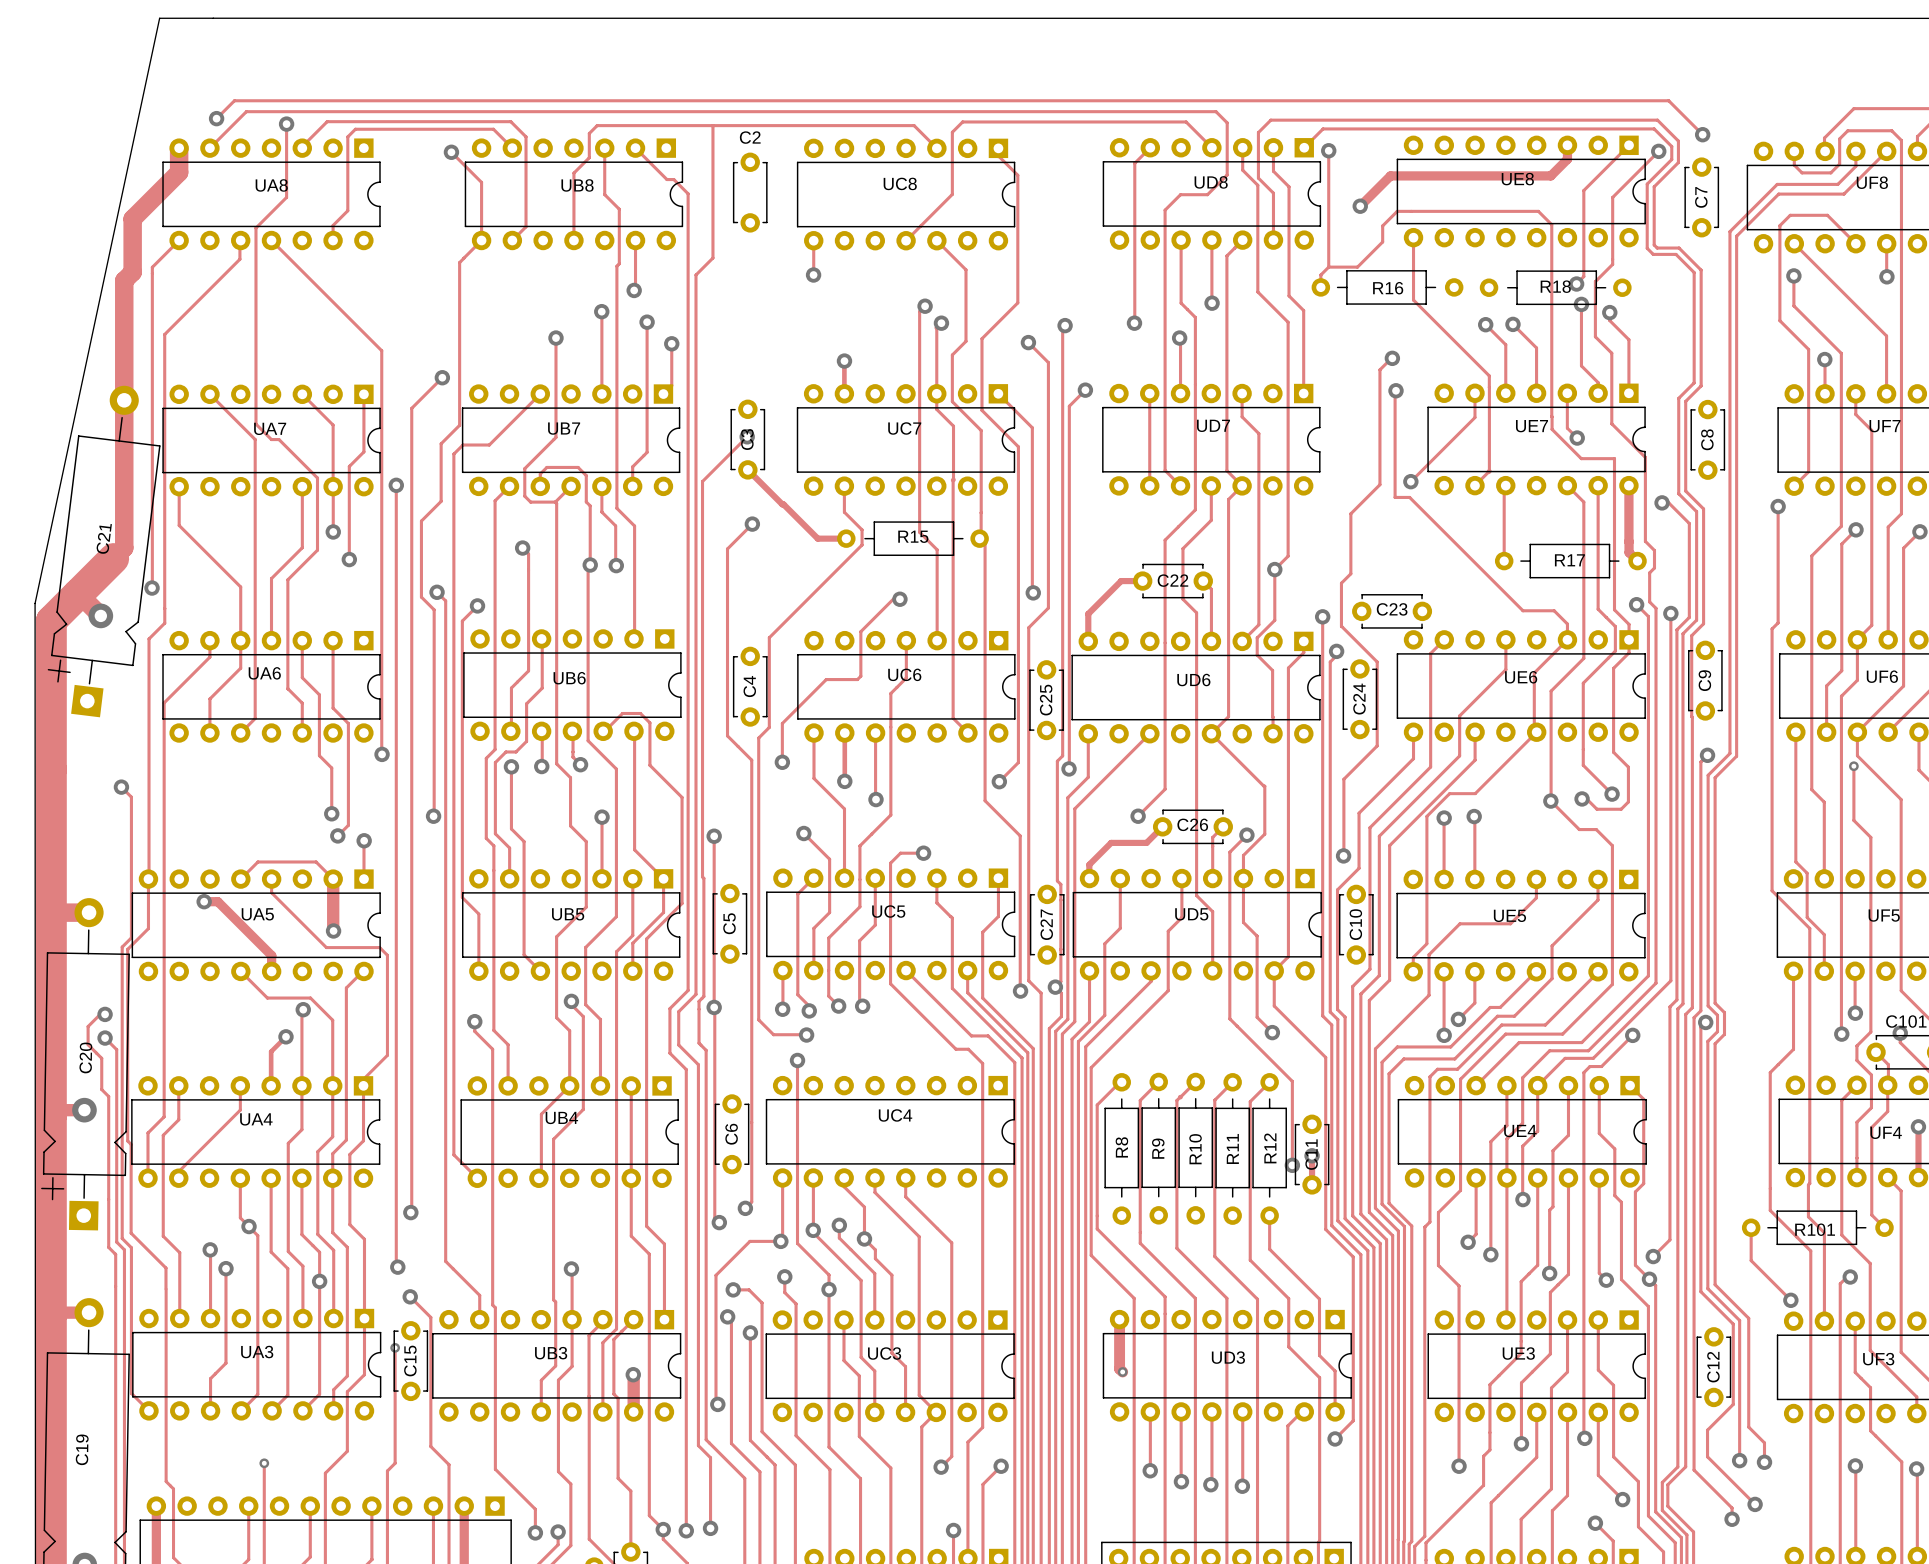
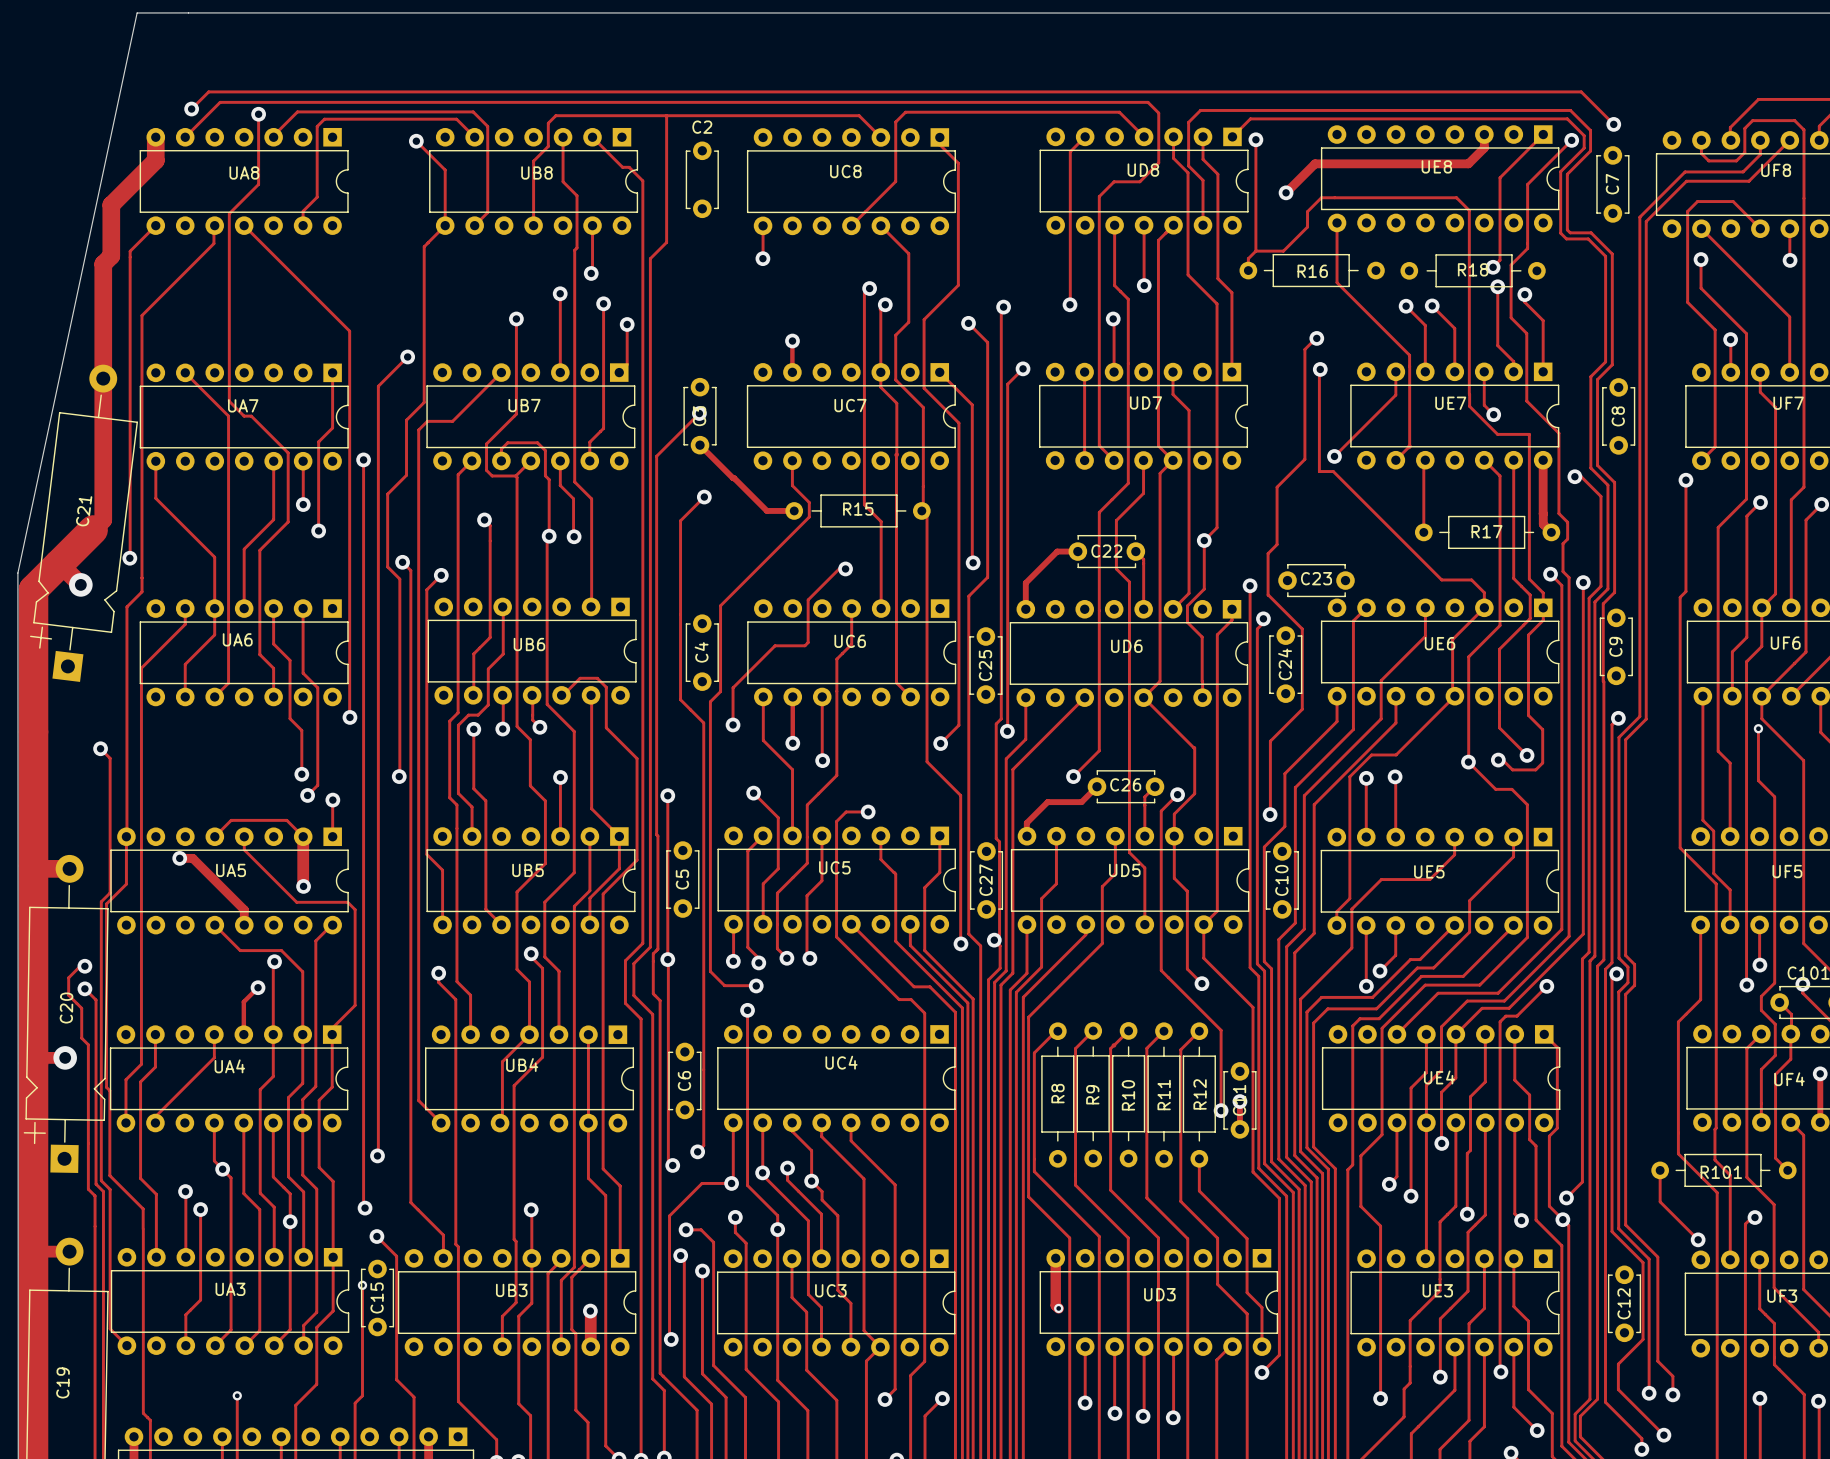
track: (302, 394) (333, 425) (333, 486) -> none

